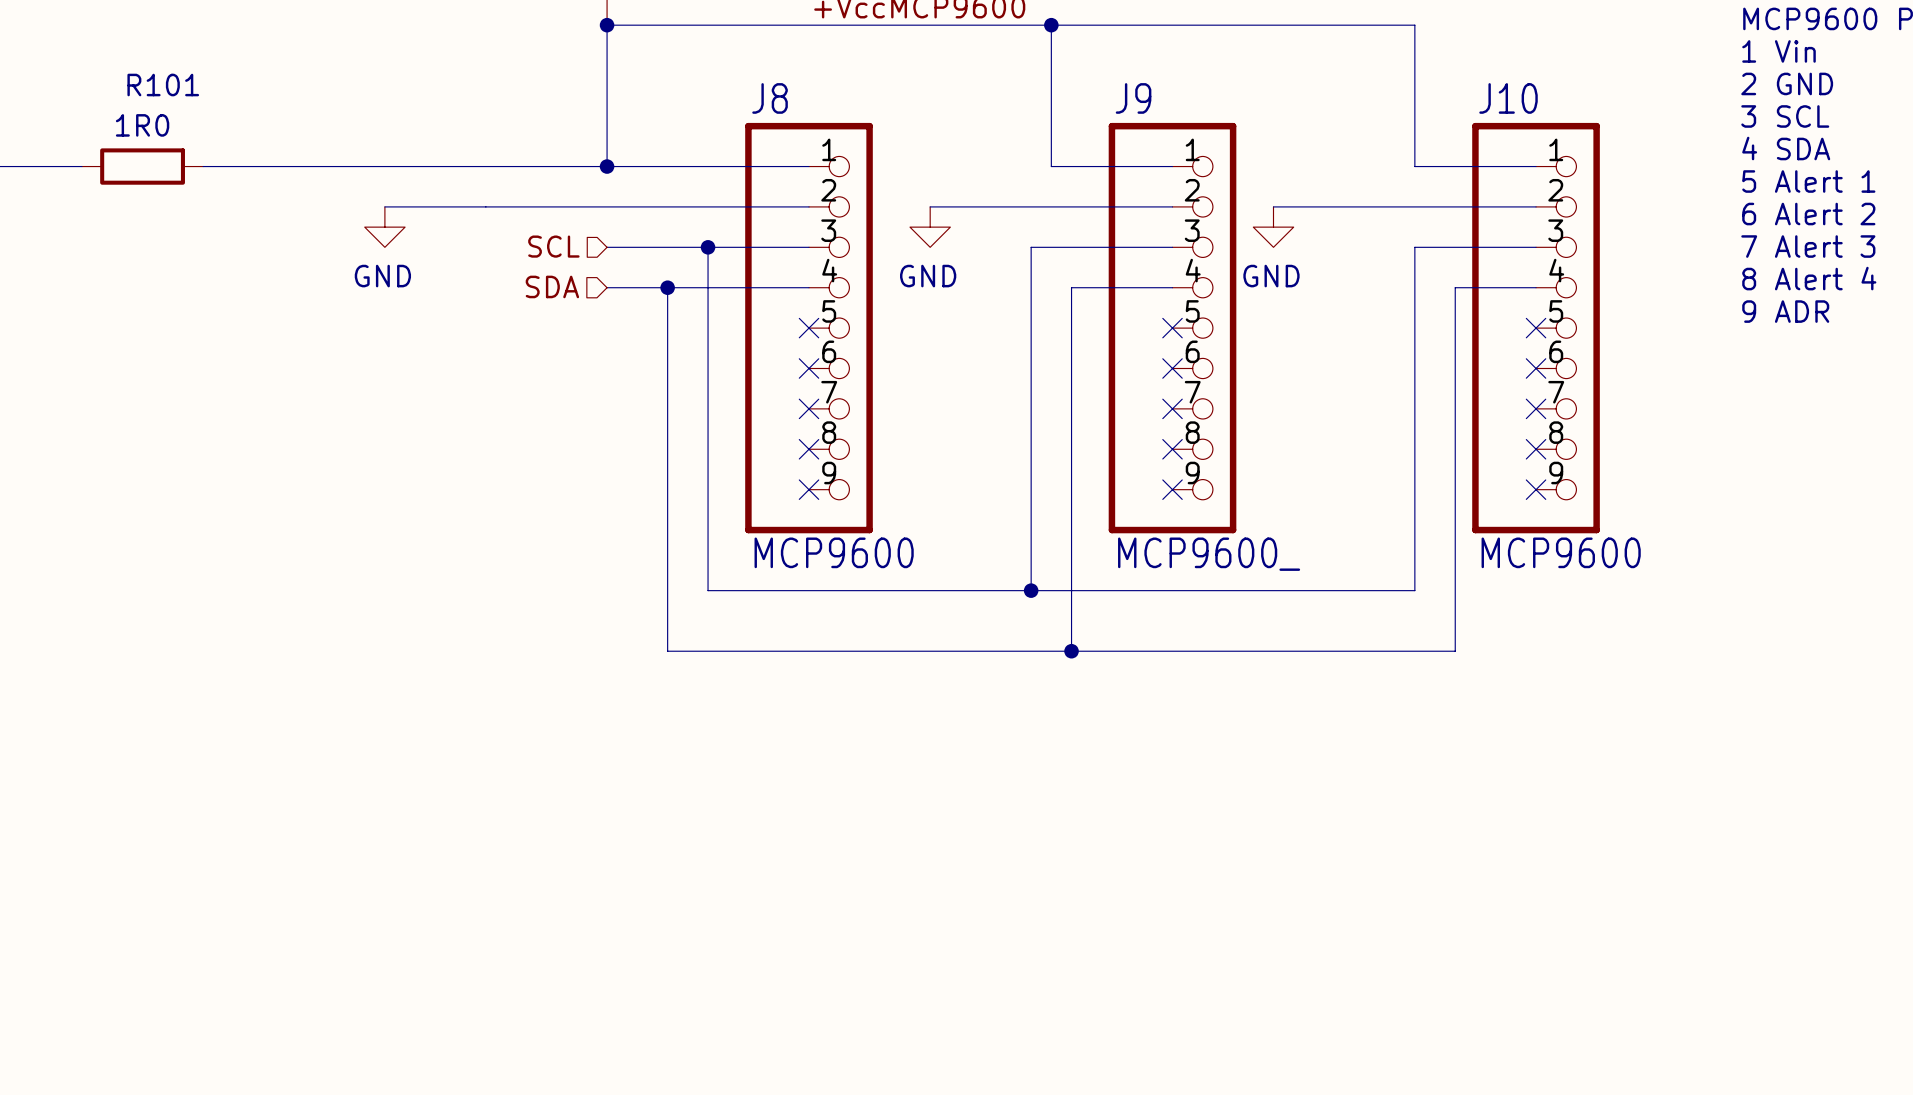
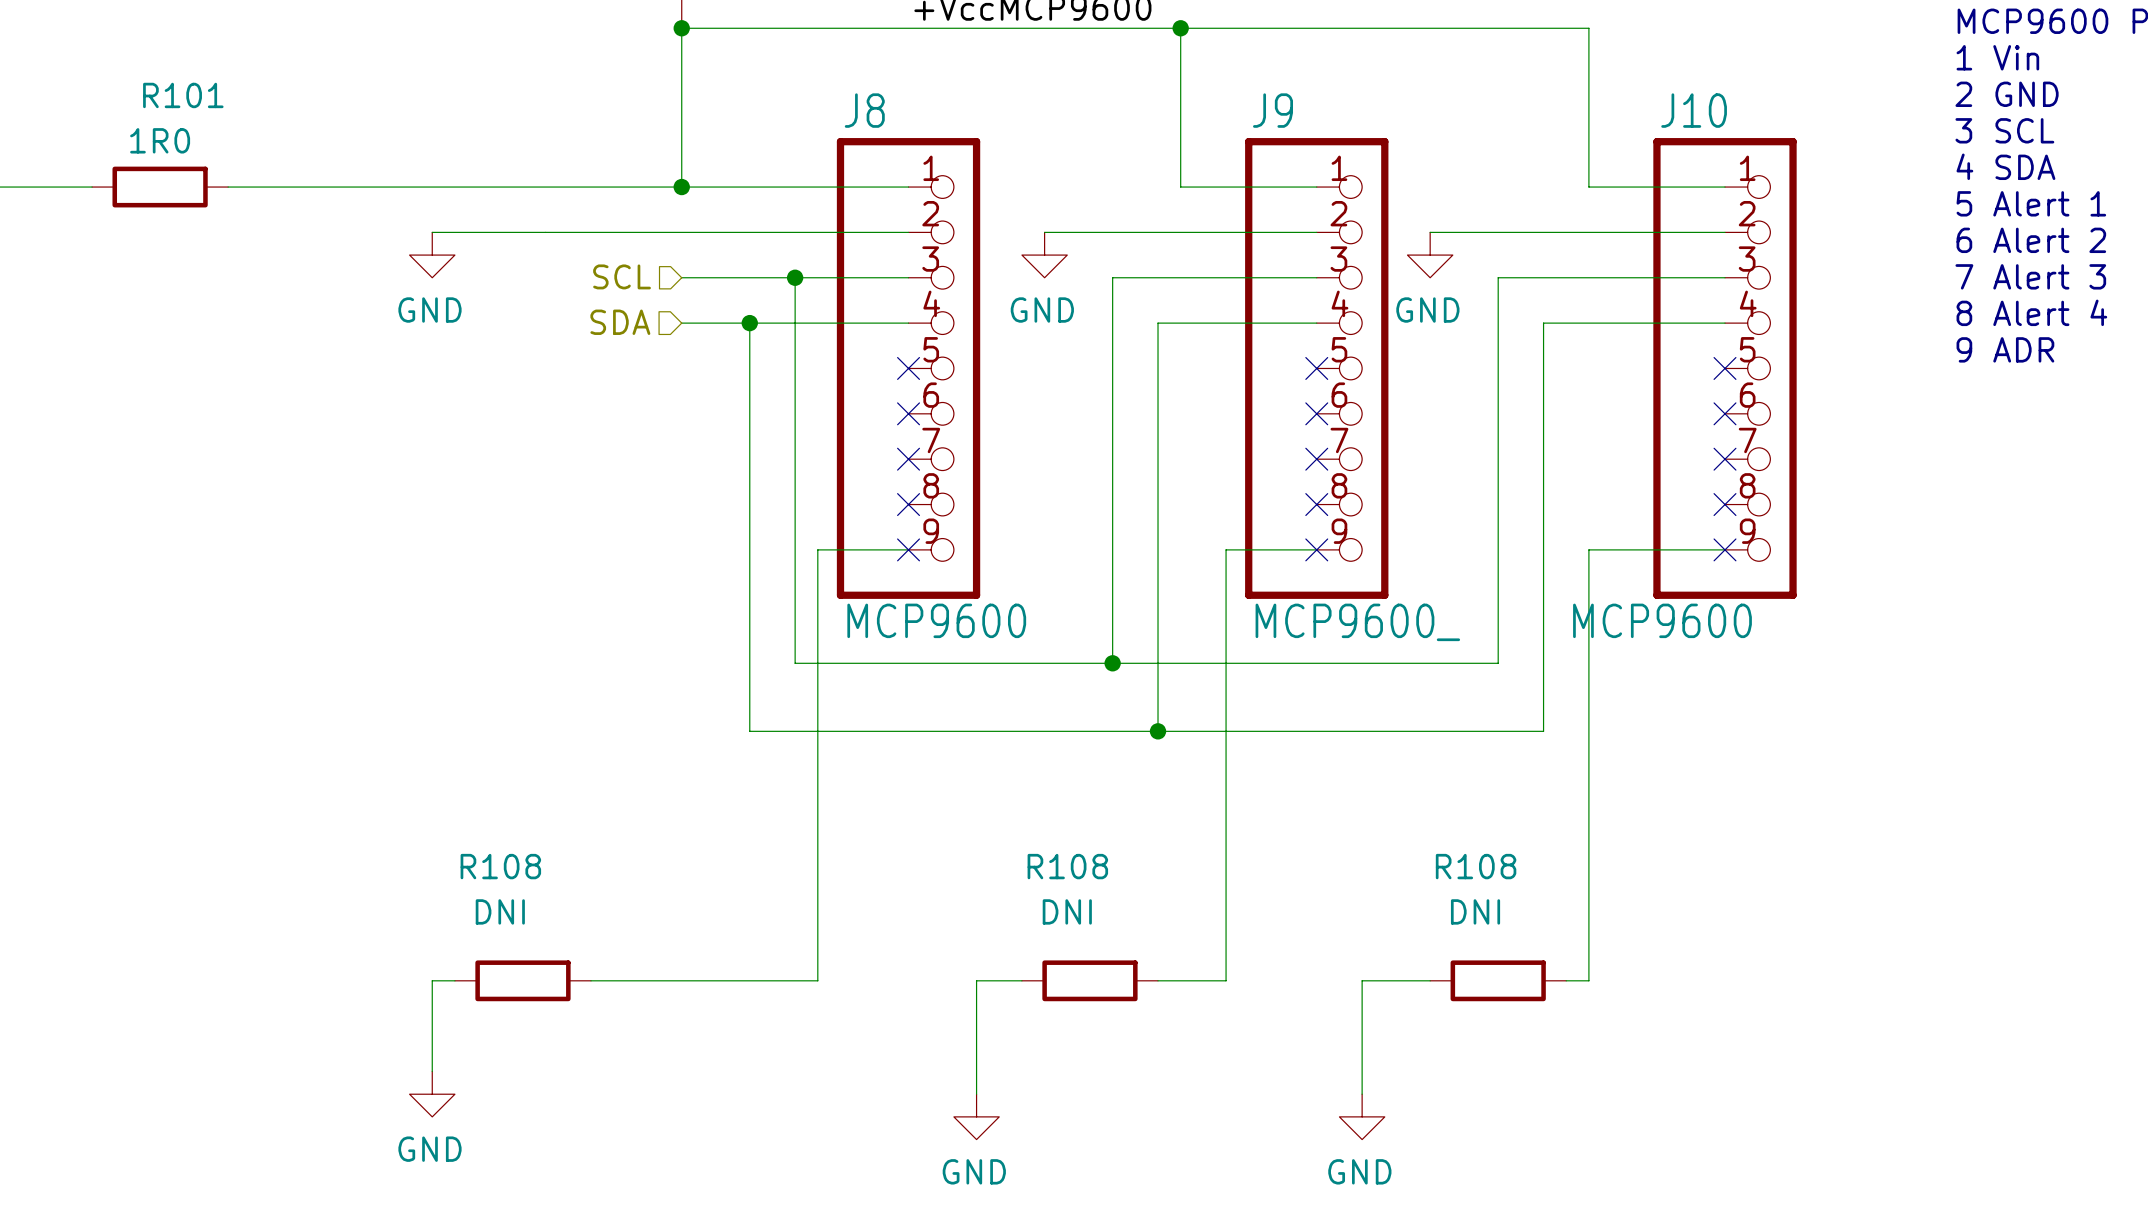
wire: (1031, 247) (1031, 287) -> (1203, 323) (1158, 323)
wire: none -> (1158, 277) (1112, 277) (1112, 663)
wire: (1414, 247) (1414, 489) -> (1588, 277) (1498, 277) (1498, 663)
wire: (1071, 287) (1071, 651) -> none
wire: (1455, 287) (1455, 651) (1374, 651) -> (1634, 323) (1543, 323) (1543, 731)
wire: none -> (908, 549) (817, 549) (817, 980) (591, 980)
wire: none -> (1316, 549) (1226, 549) (1226, 980) (1158, 980)
wire: none -> (1588, 549) (1724, 549)
J10 value position: MCP9600 (1561, 552) -> MCP9600 (1662, 620)
junction: none -> (1112, 663)
wire: none -> (1158, 663) (1158, 731)
junction: (1031, 590) -> none
wire: (1334, 590) (1414, 590) -> (1566, 980) (1588, 980) (1588, 663)
junction: none -> (1158, 731)
junction: (1071, 651) -> none
wire: none -> (454, 980) (432, 980) (432, 1071)
R108: none -> DNI (522, 980)
wire: none -> (1021, 980) (976, 980) (976, 1094)
R108: none -> DNI (1089, 980)
wire: none -> (1430, 980) (1362, 980) (1362, 1094)
R108: none -> DNI (1498, 980)
power symbol: none -> GND (432, 1094)
power symbol: none -> GND (976, 1116)
power symbol: none -> GND (1362, 1116)

